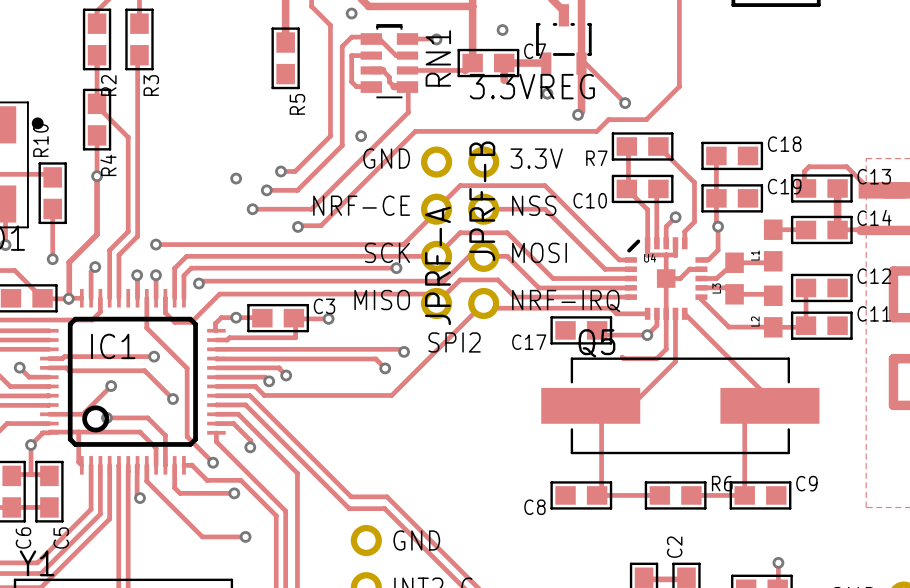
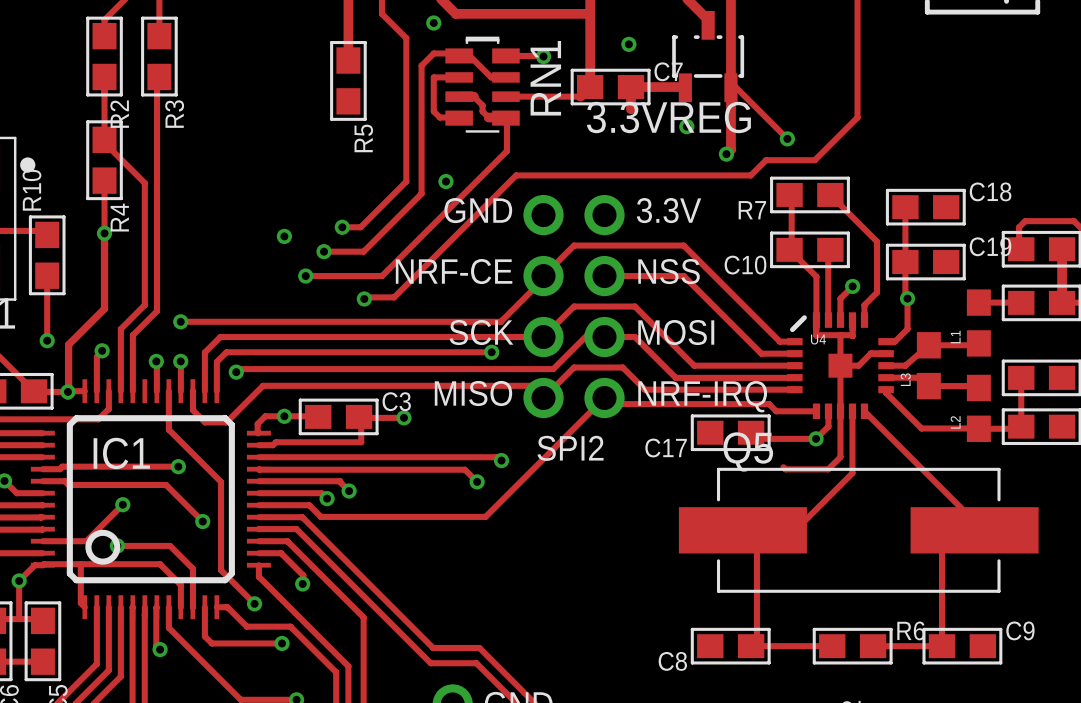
JPRF-B name: JPRF-B (482, 201) -> none
JPRF-A name: JPRF-A (437, 265) -> none

